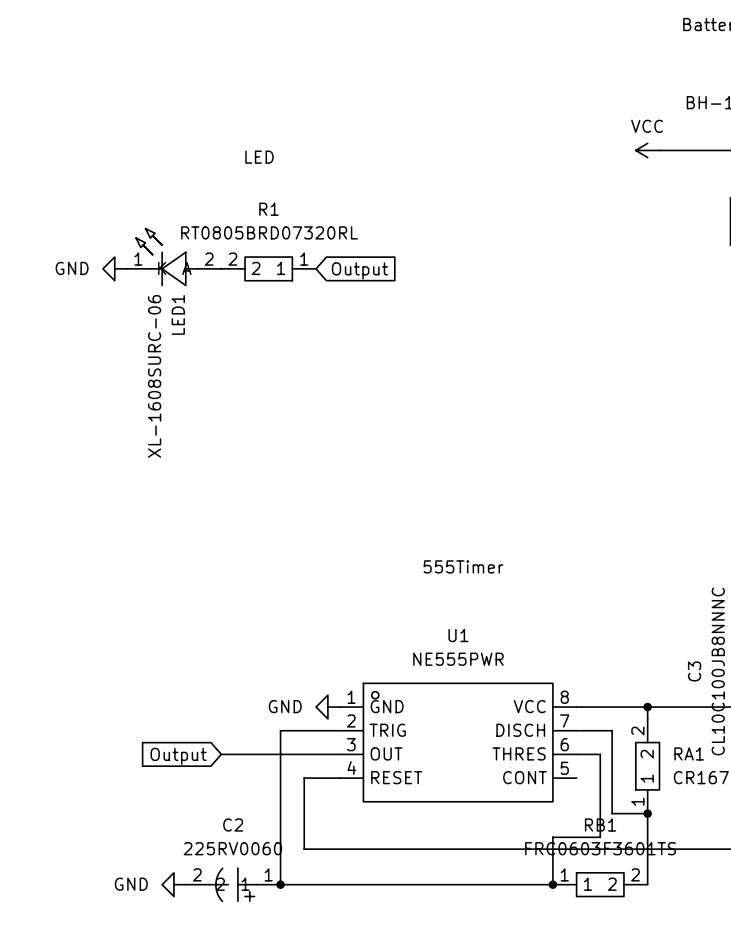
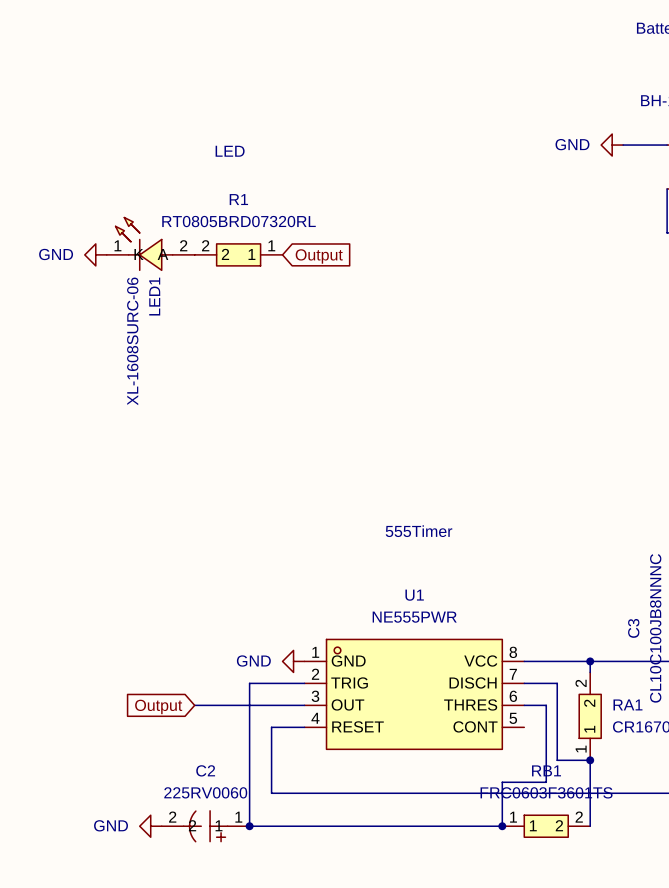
power symbol: VCC (647, 150) -> none
power symbol: none -> GND (612, 145)

